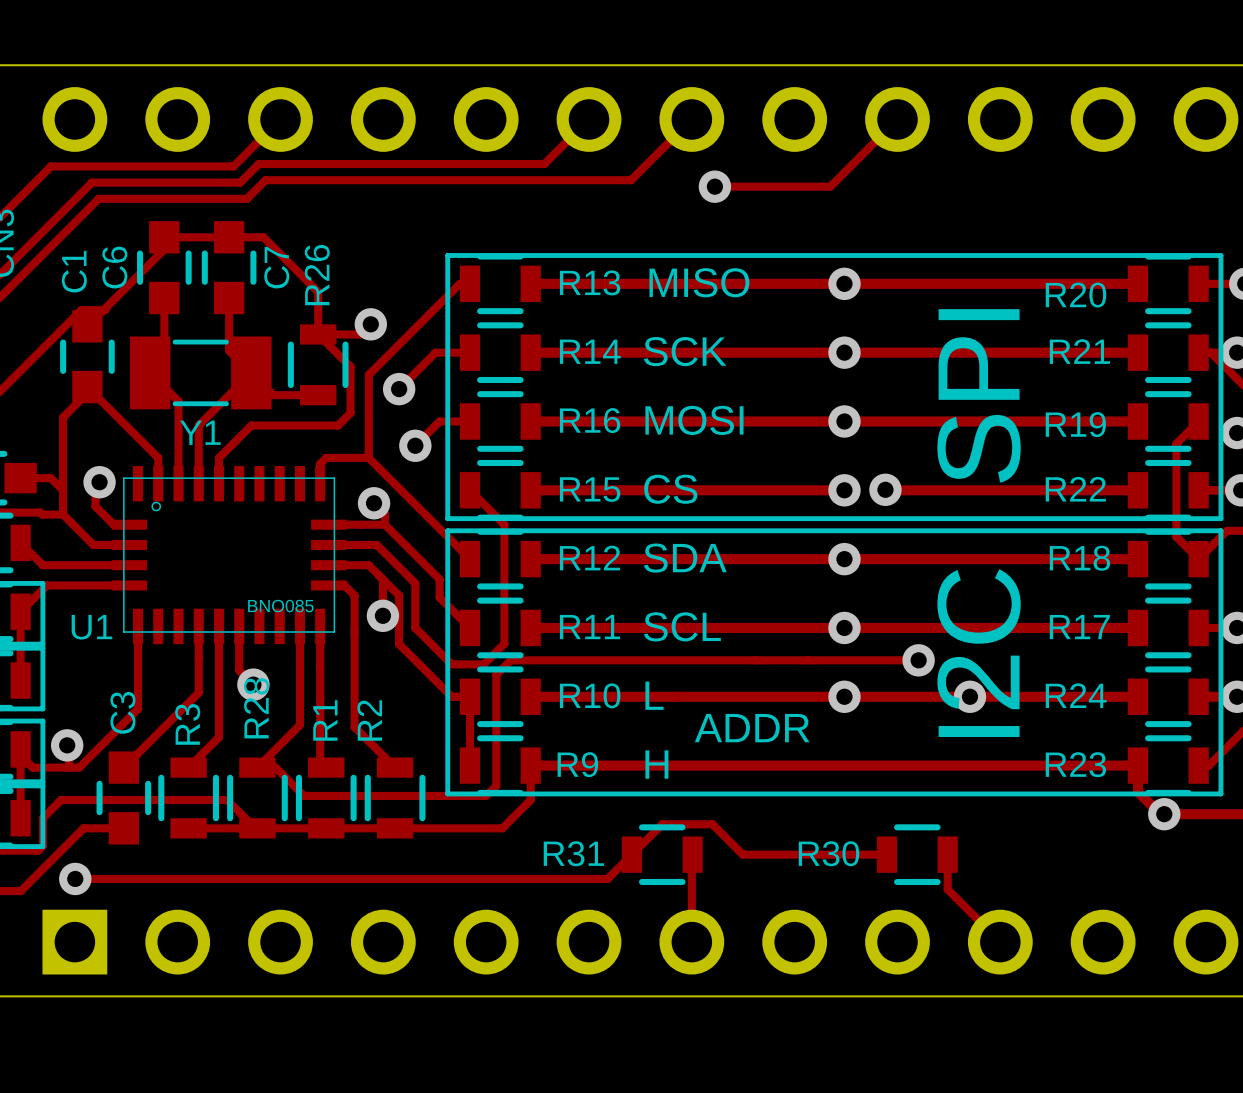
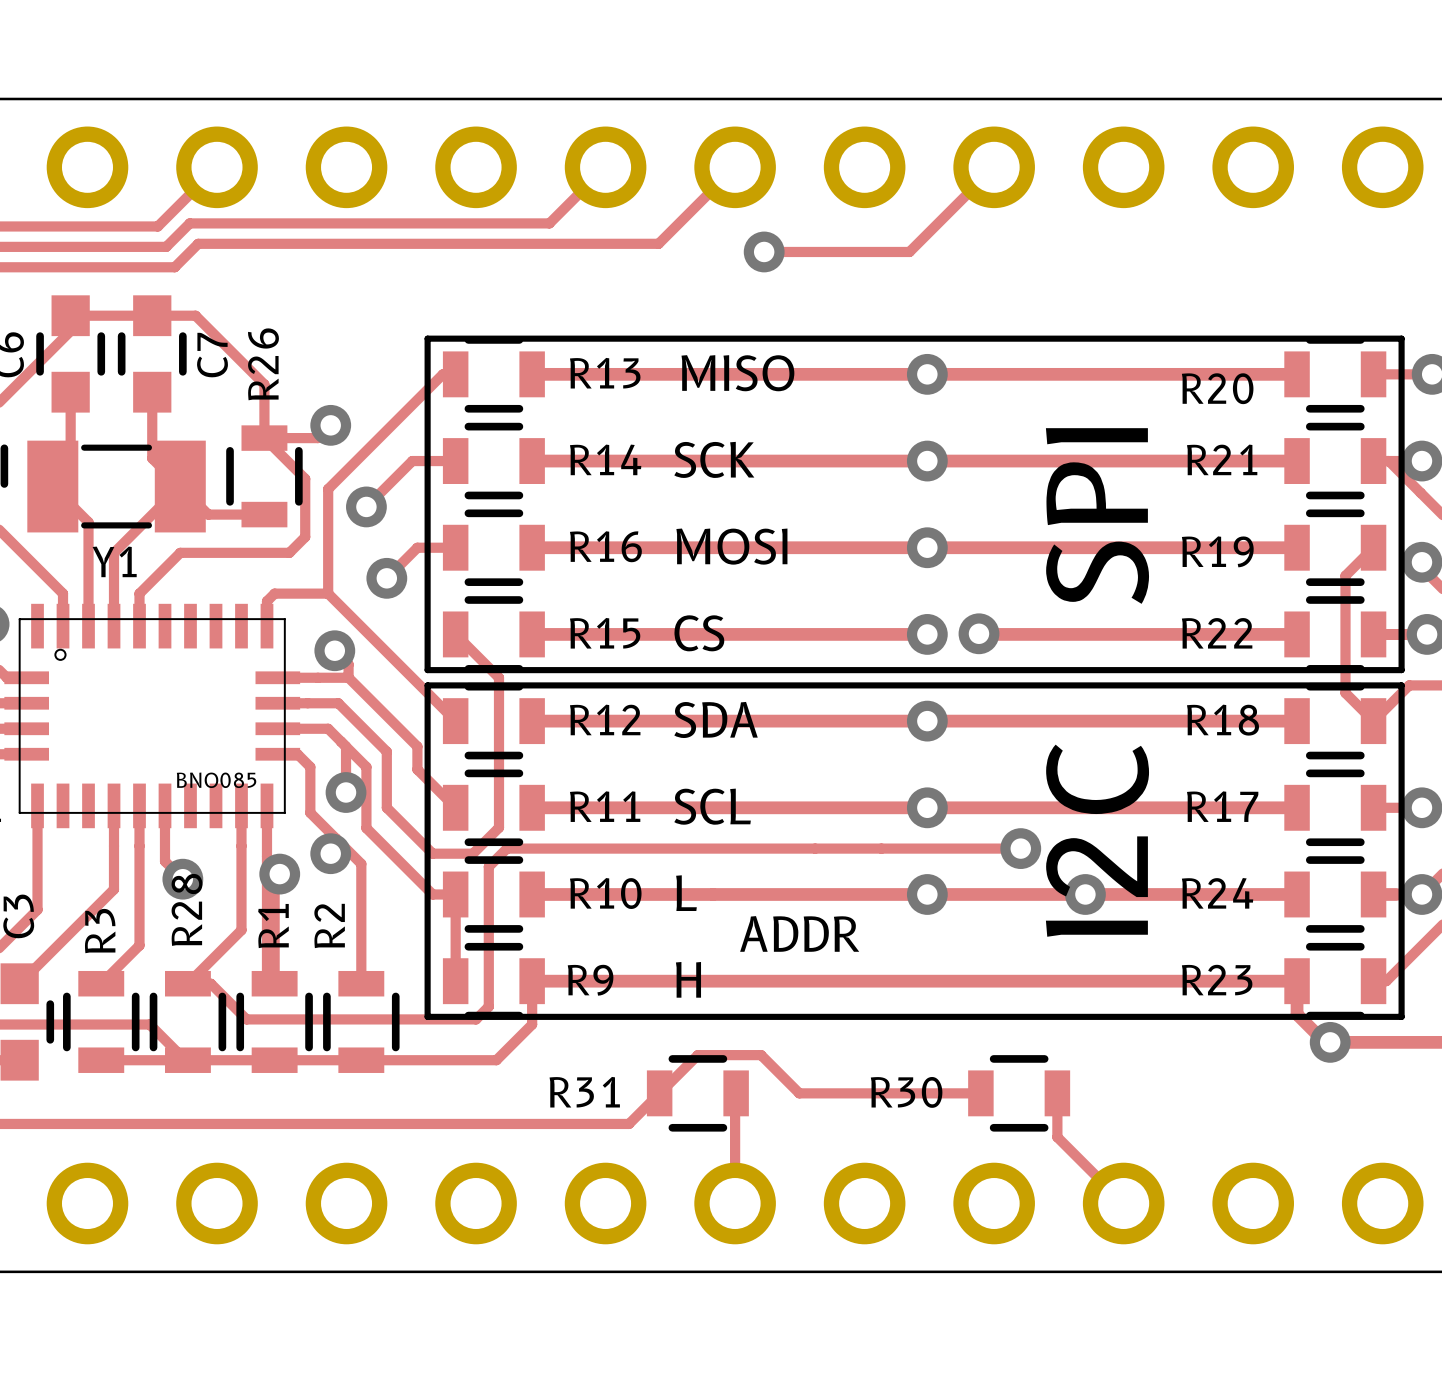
track: (354, 632) (354, 727) (395, 767) -> (310, 812) (361, 863) (361, 983)
via: none -> (330, 853)
track: none -> (279, 874) (274, 879) (274, 983)
via: none -> (279, 874)

